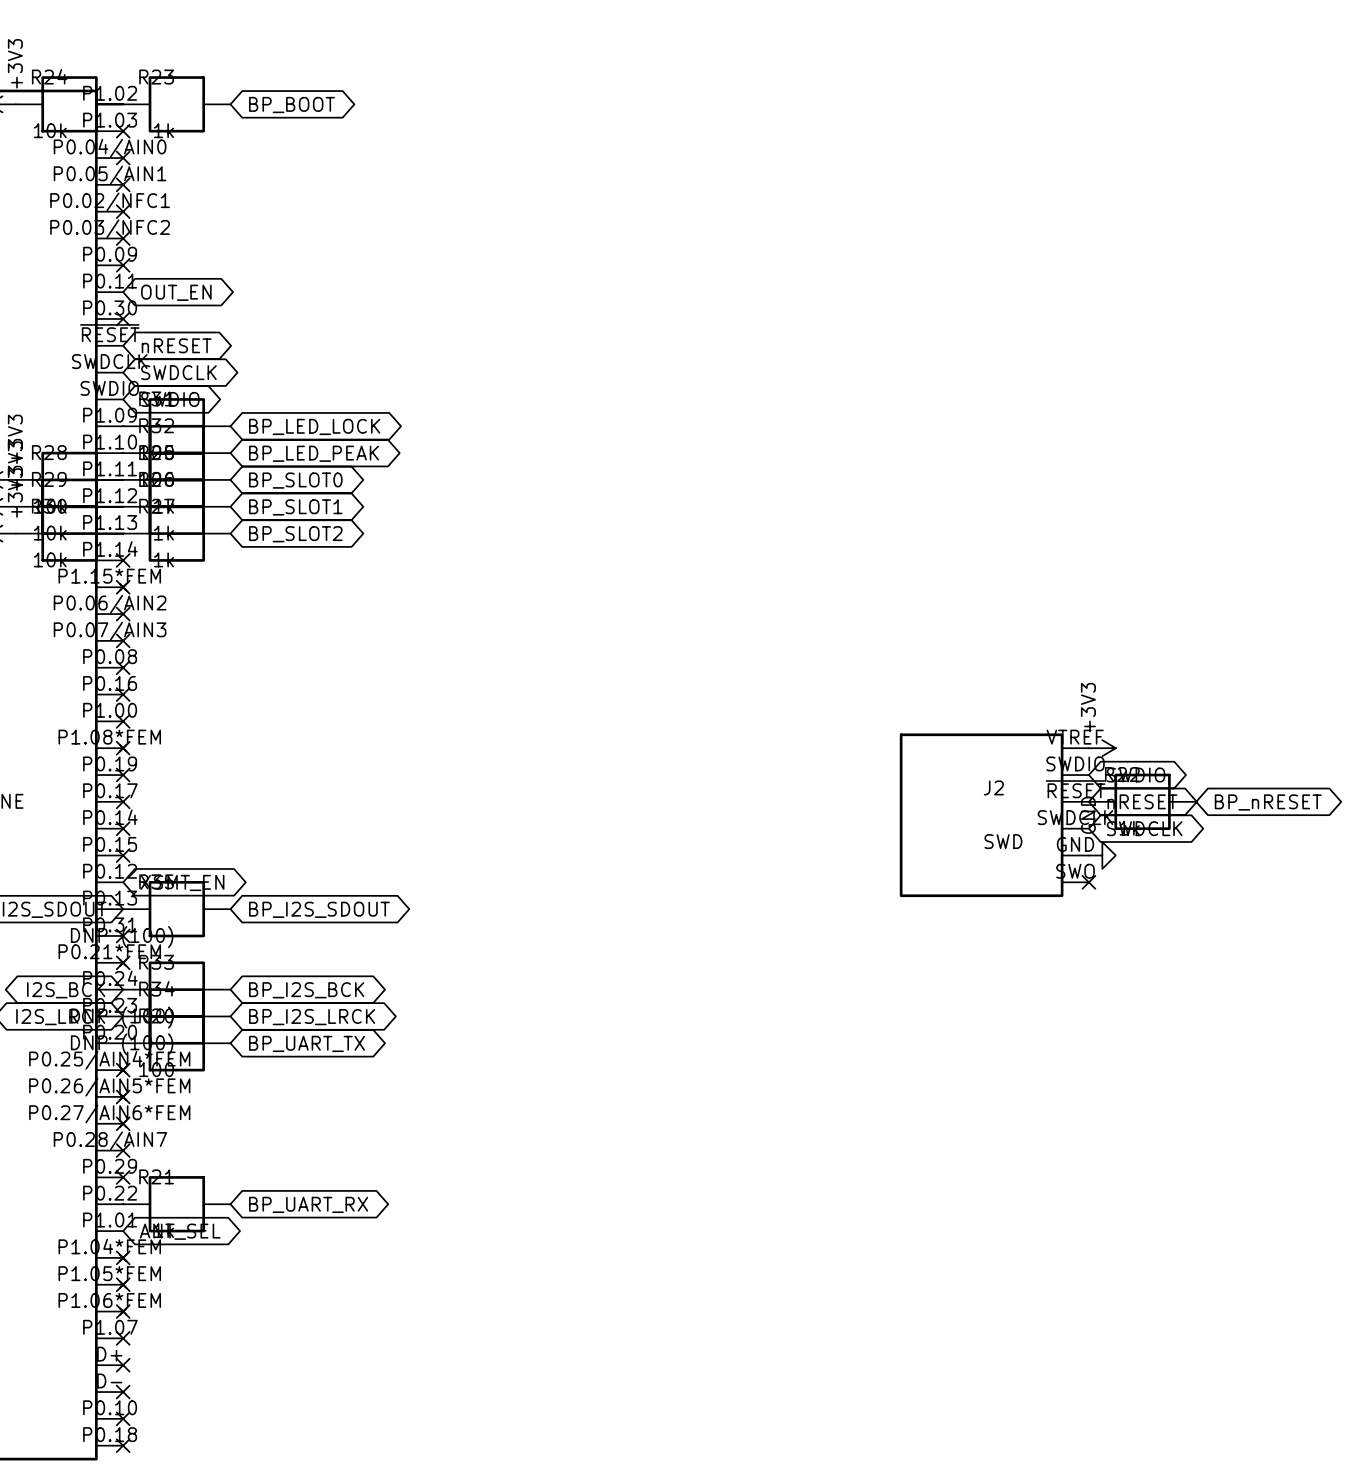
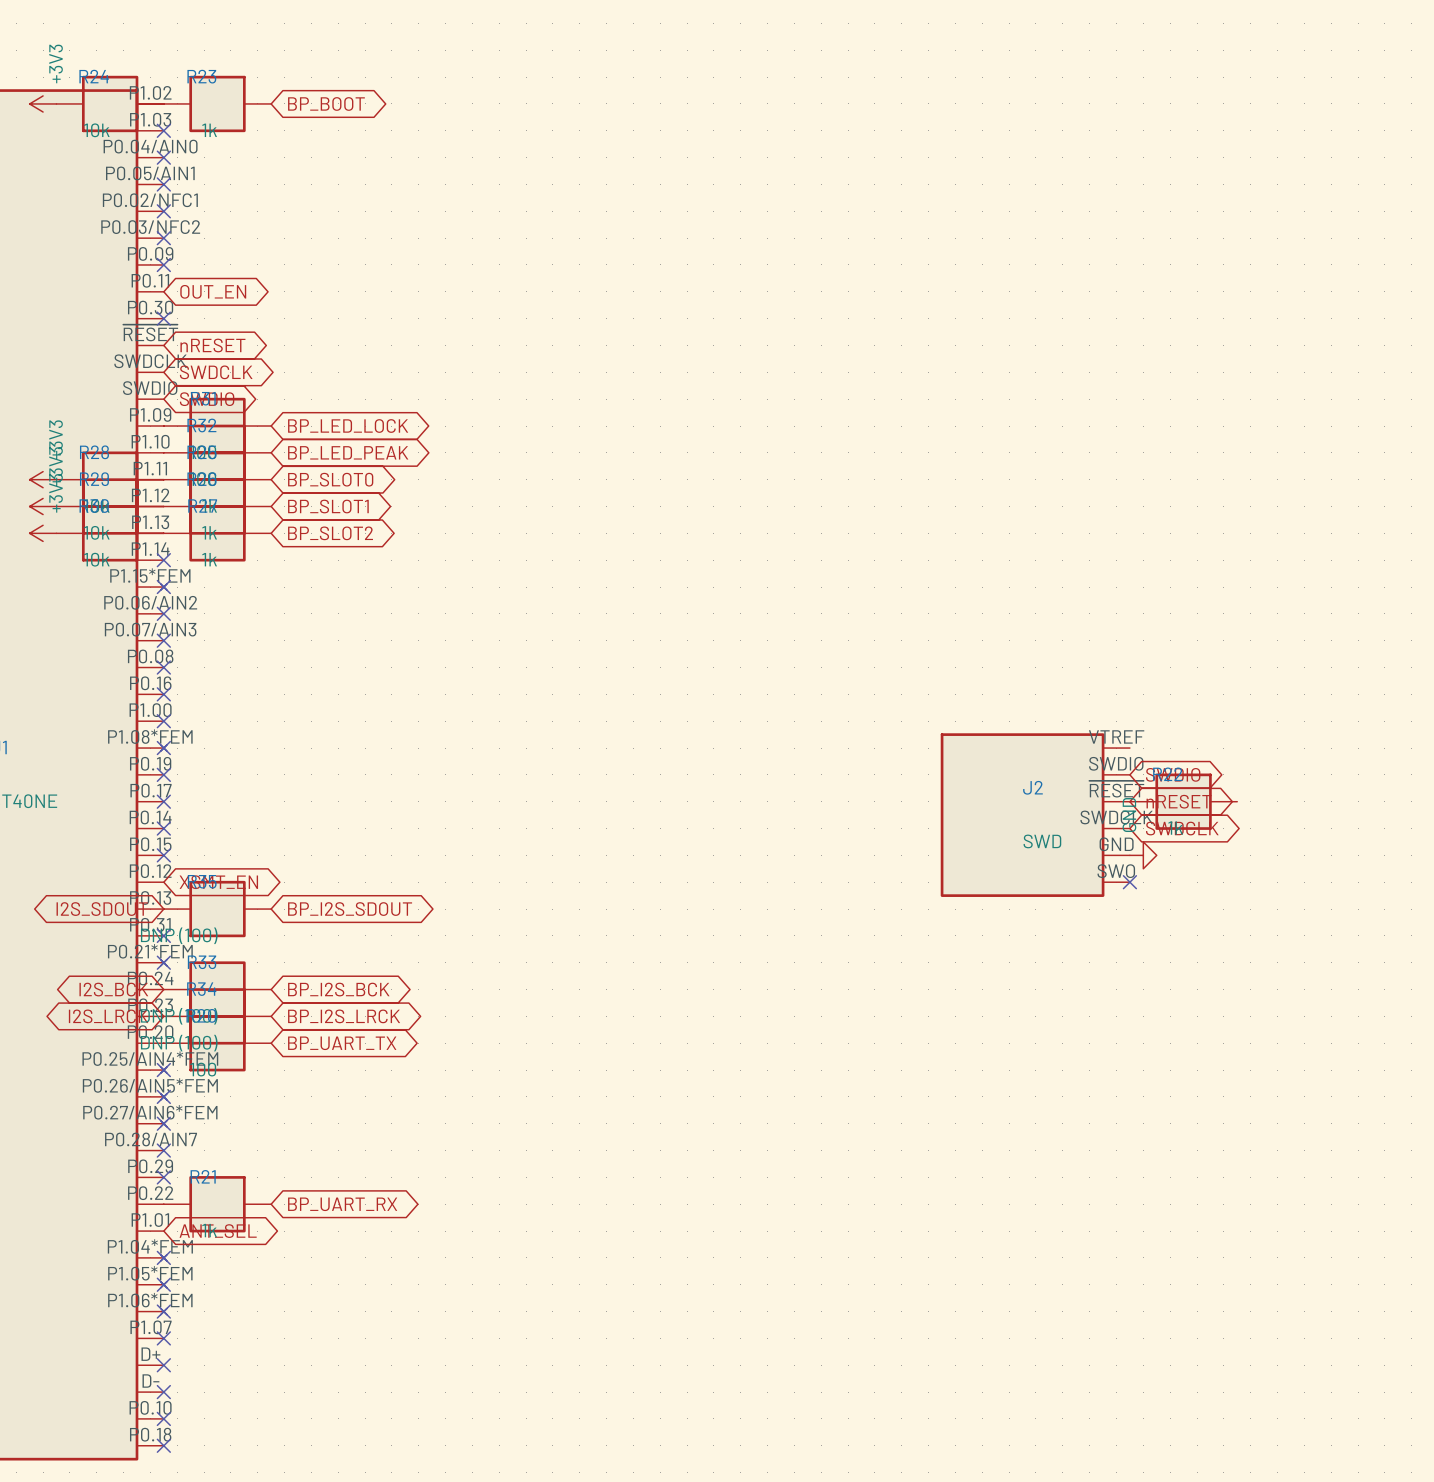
power symbol: +3V3 (1102, 748) -> none
global label: BP_nRESET (1268, 802) -> none

